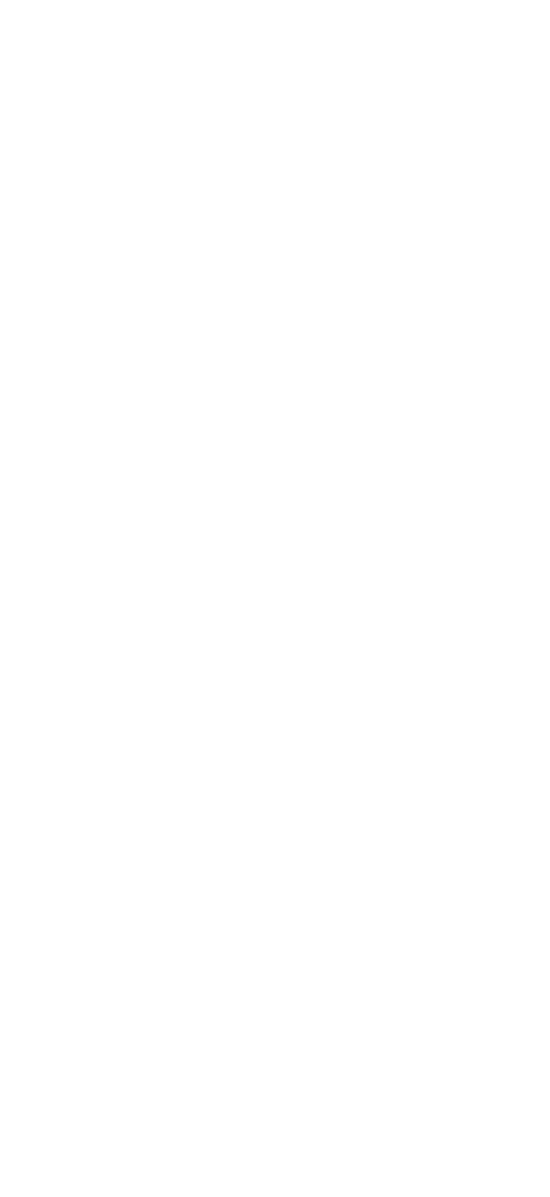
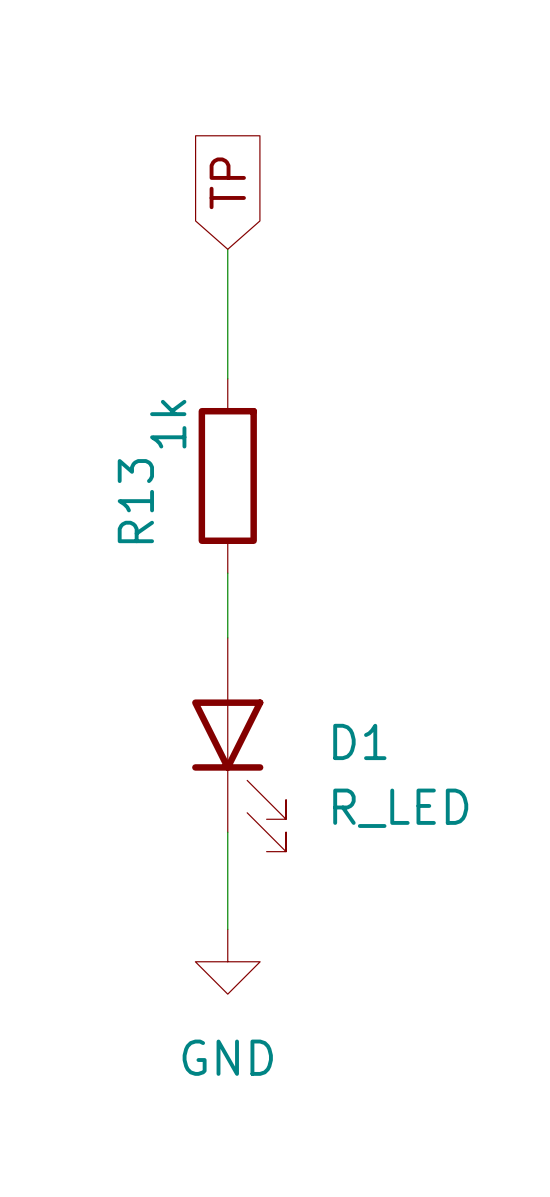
global label: none -> TP (227, 183)
wire: none -> (227, 249) (227, 378)
R13: none -> 1k (227, 475)
wire: none -> (227, 573) (227, 637)
D1: none -> R_LED (239, 744)
wire: none -> (227, 832) (227, 929)
power symbol: none -> GND (227, 961)

